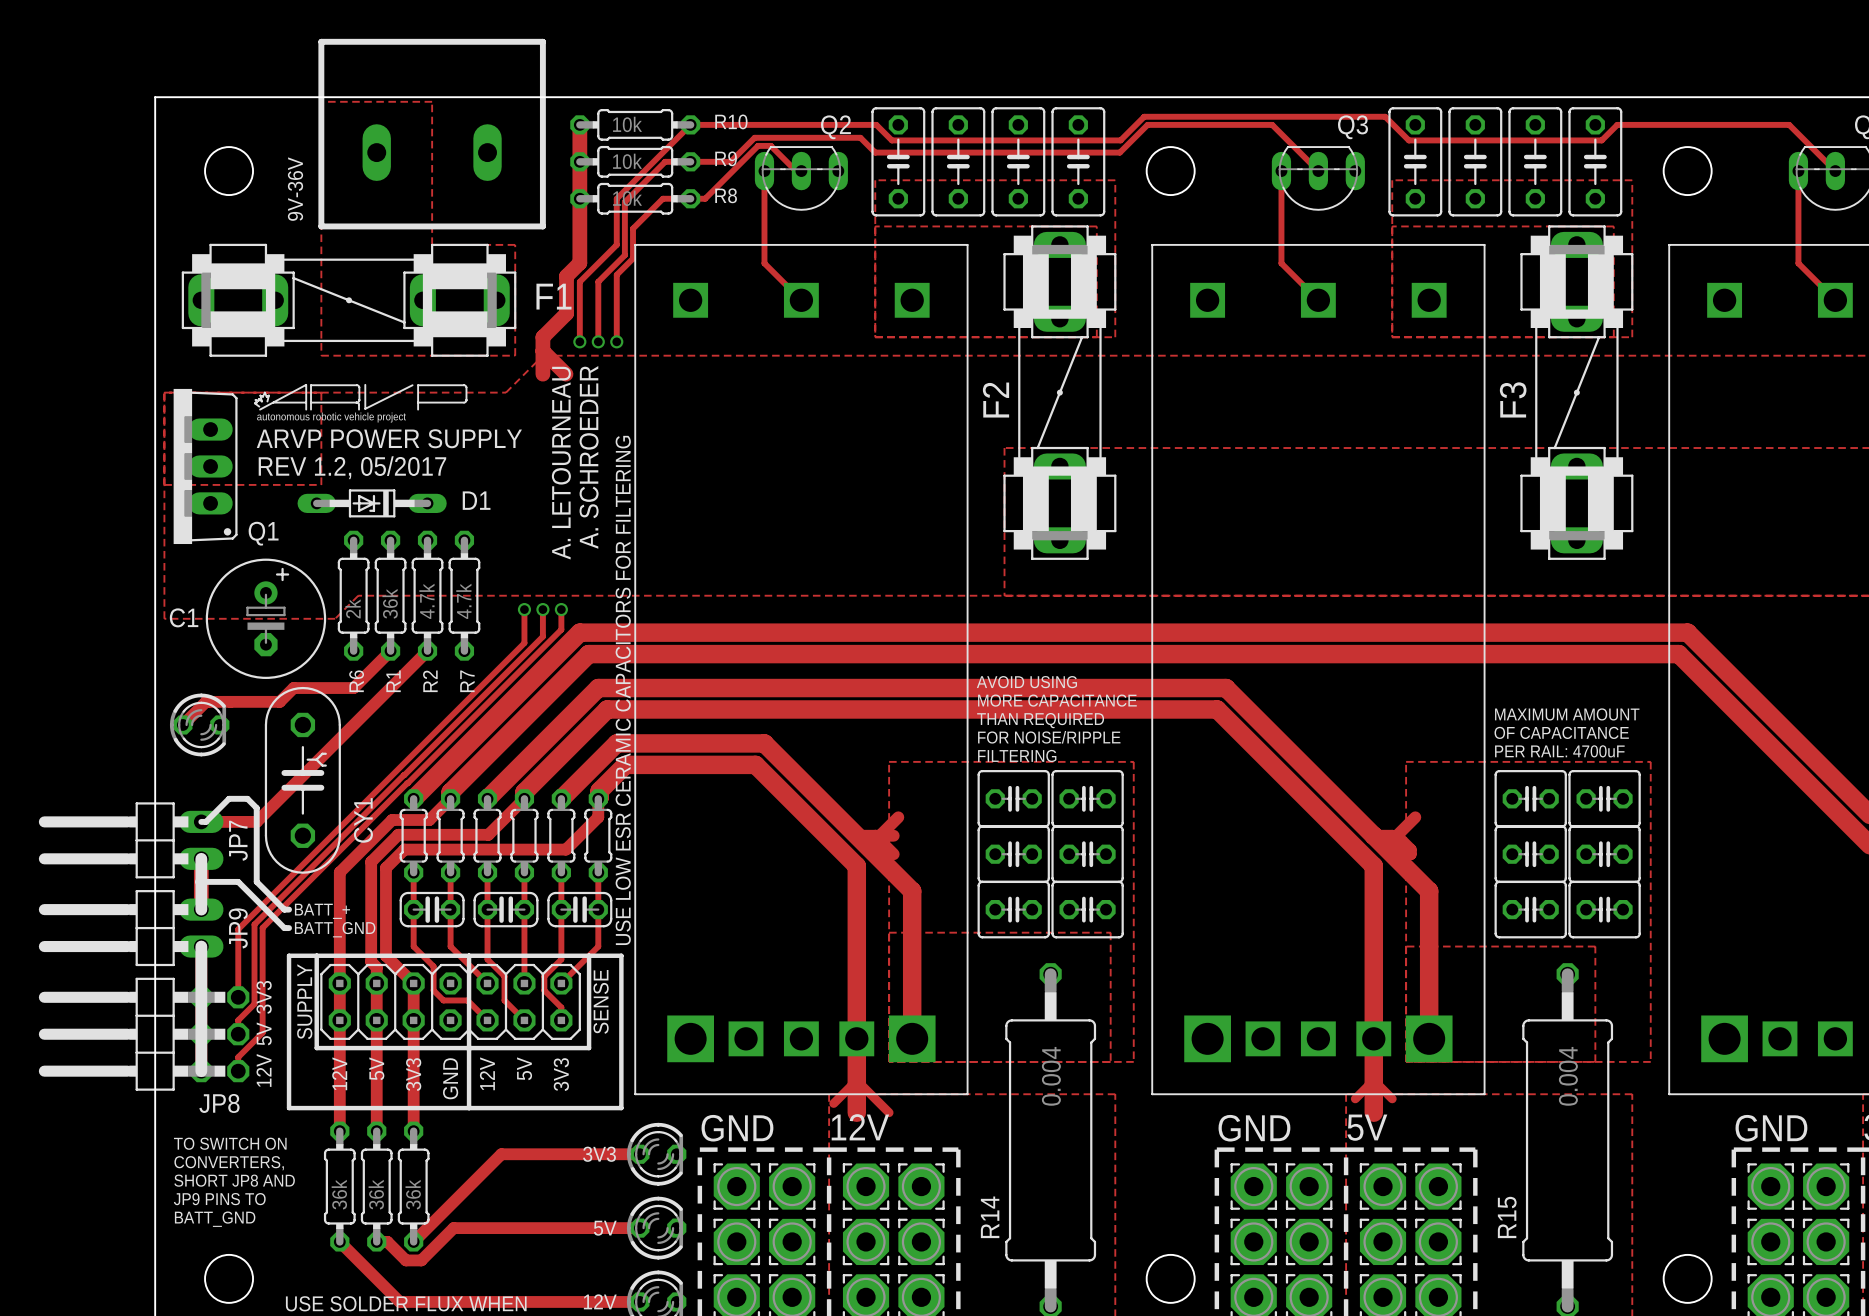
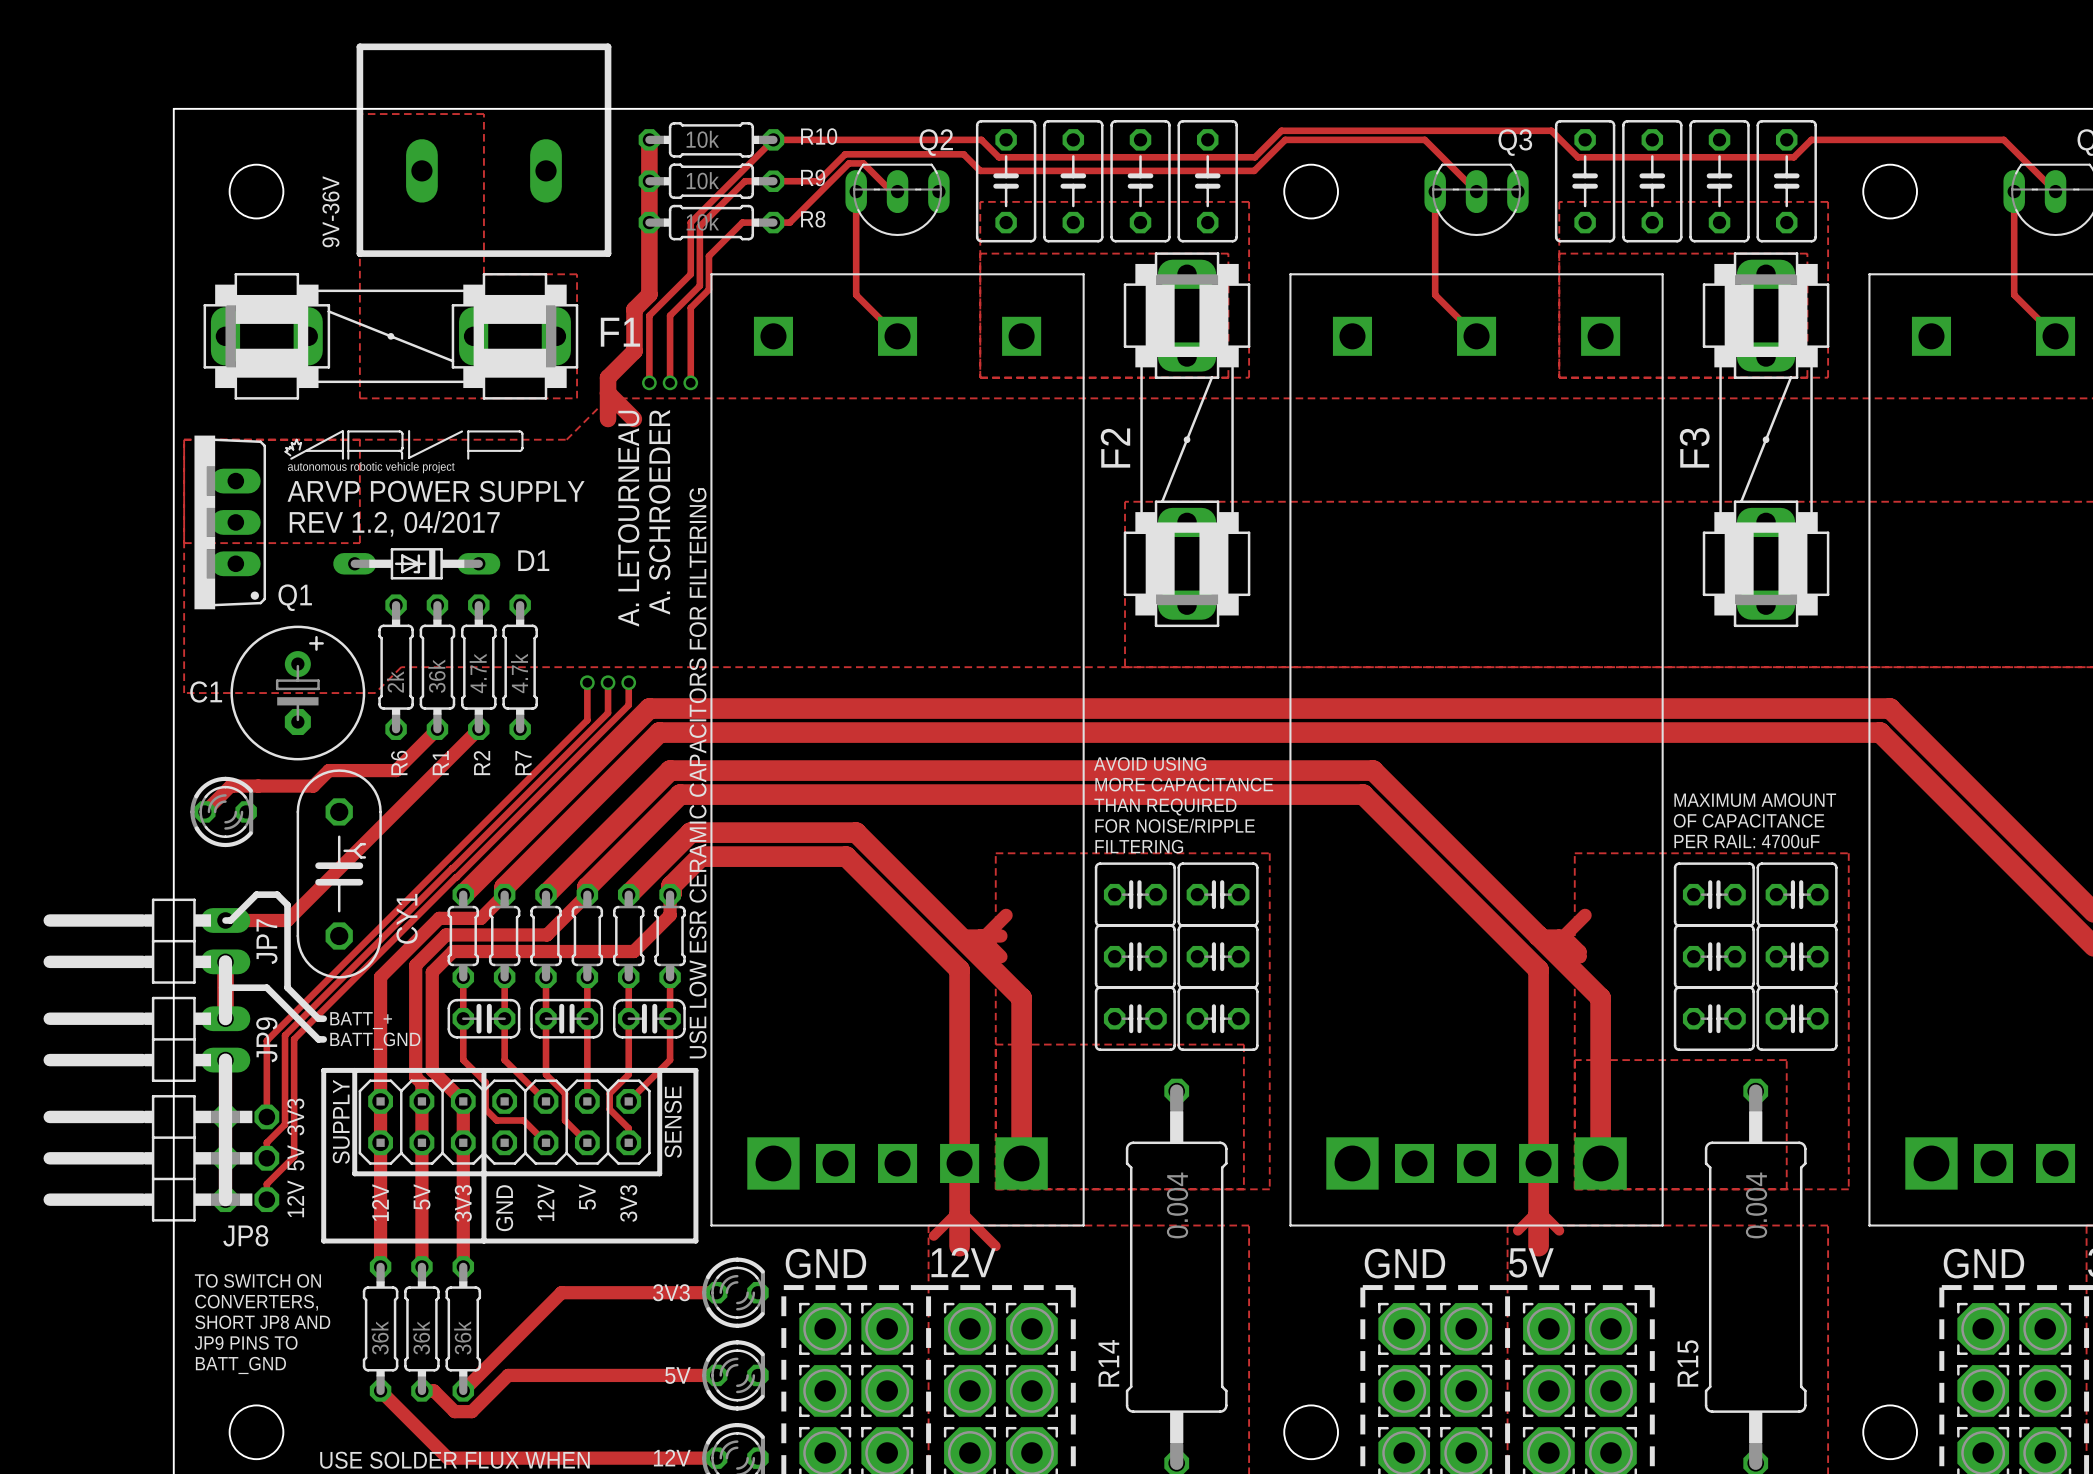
text: REV 1.2, 05/2017 (352, 467) -> REV 1.2, 04/2017 (394, 523)
line: (469, 955) (469, 1108) -> (483, 1070) (483, 1241)

